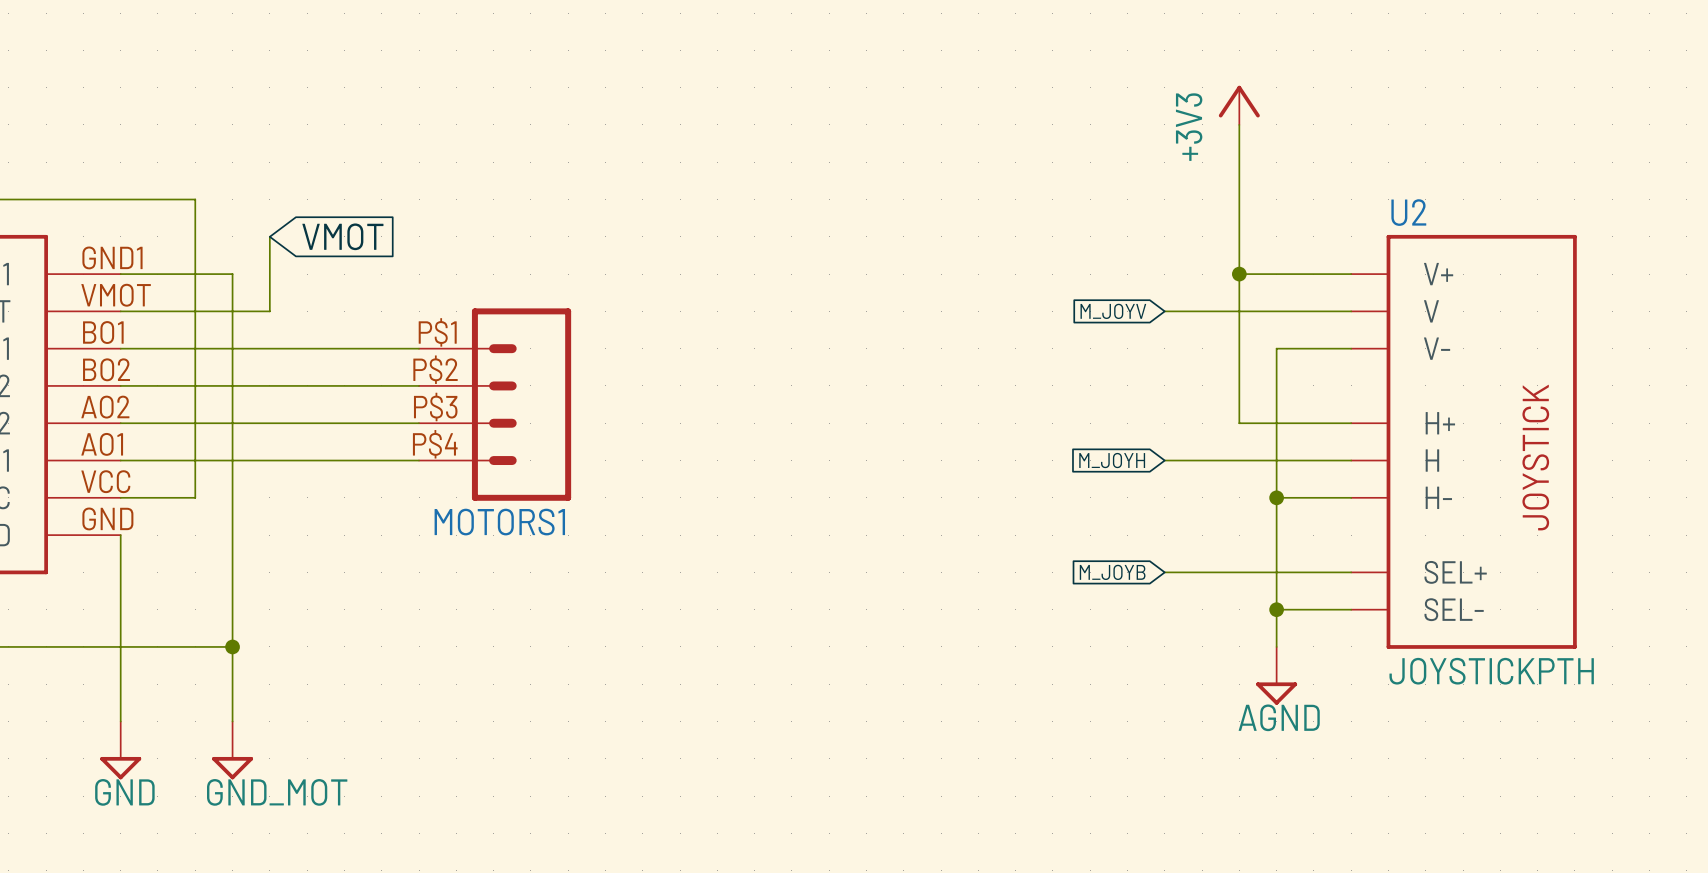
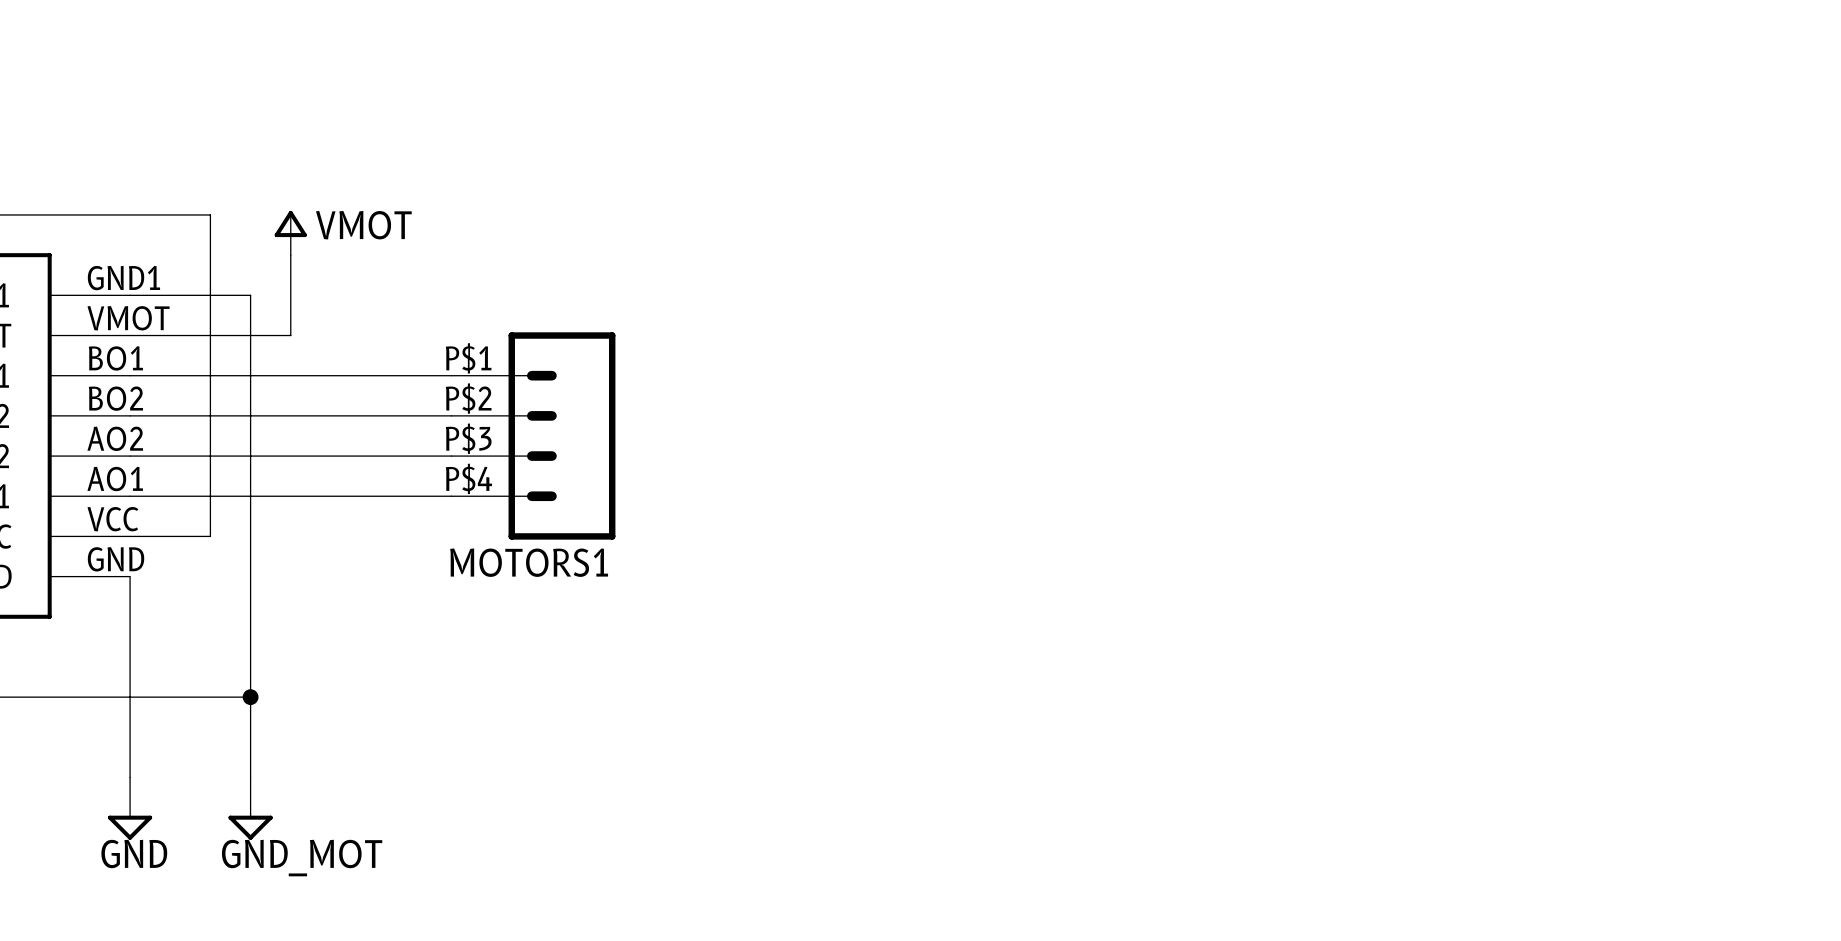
power symbol: +3V3 (1239, 105) -> none
wire: (1239, 124) (1239, 423) (1351, 423) -> none
power symbol: none -> (290, 233)
global label: VMOT (342, 236) -> none
wire: (1239, 274) (1351, 274) -> none
junction: (1239, 274) -> none
global label: M_JOYV (1113, 311) -> none
wire: (1164, 311) (1351, 311) -> none
wire: (1351, 348) (1276, 348) (1276, 646) -> none
U2: JOYSTICKPTH (1463, 441) -> none
global label: M_JOYH (1112, 460) -> none
wire: (1164, 460) (1351, 460) -> none
wire: (1276, 497) (1351, 497) -> none
junction: (1276, 497) -> none
global label: M_JOYB (1112, 572) -> none
wire: (1164, 572) (1351, 572) -> none
wire: (1276, 609) (1351, 609) -> none
junction: (1276, 609) -> none
power symbol: AGND (1276, 675) -> none

